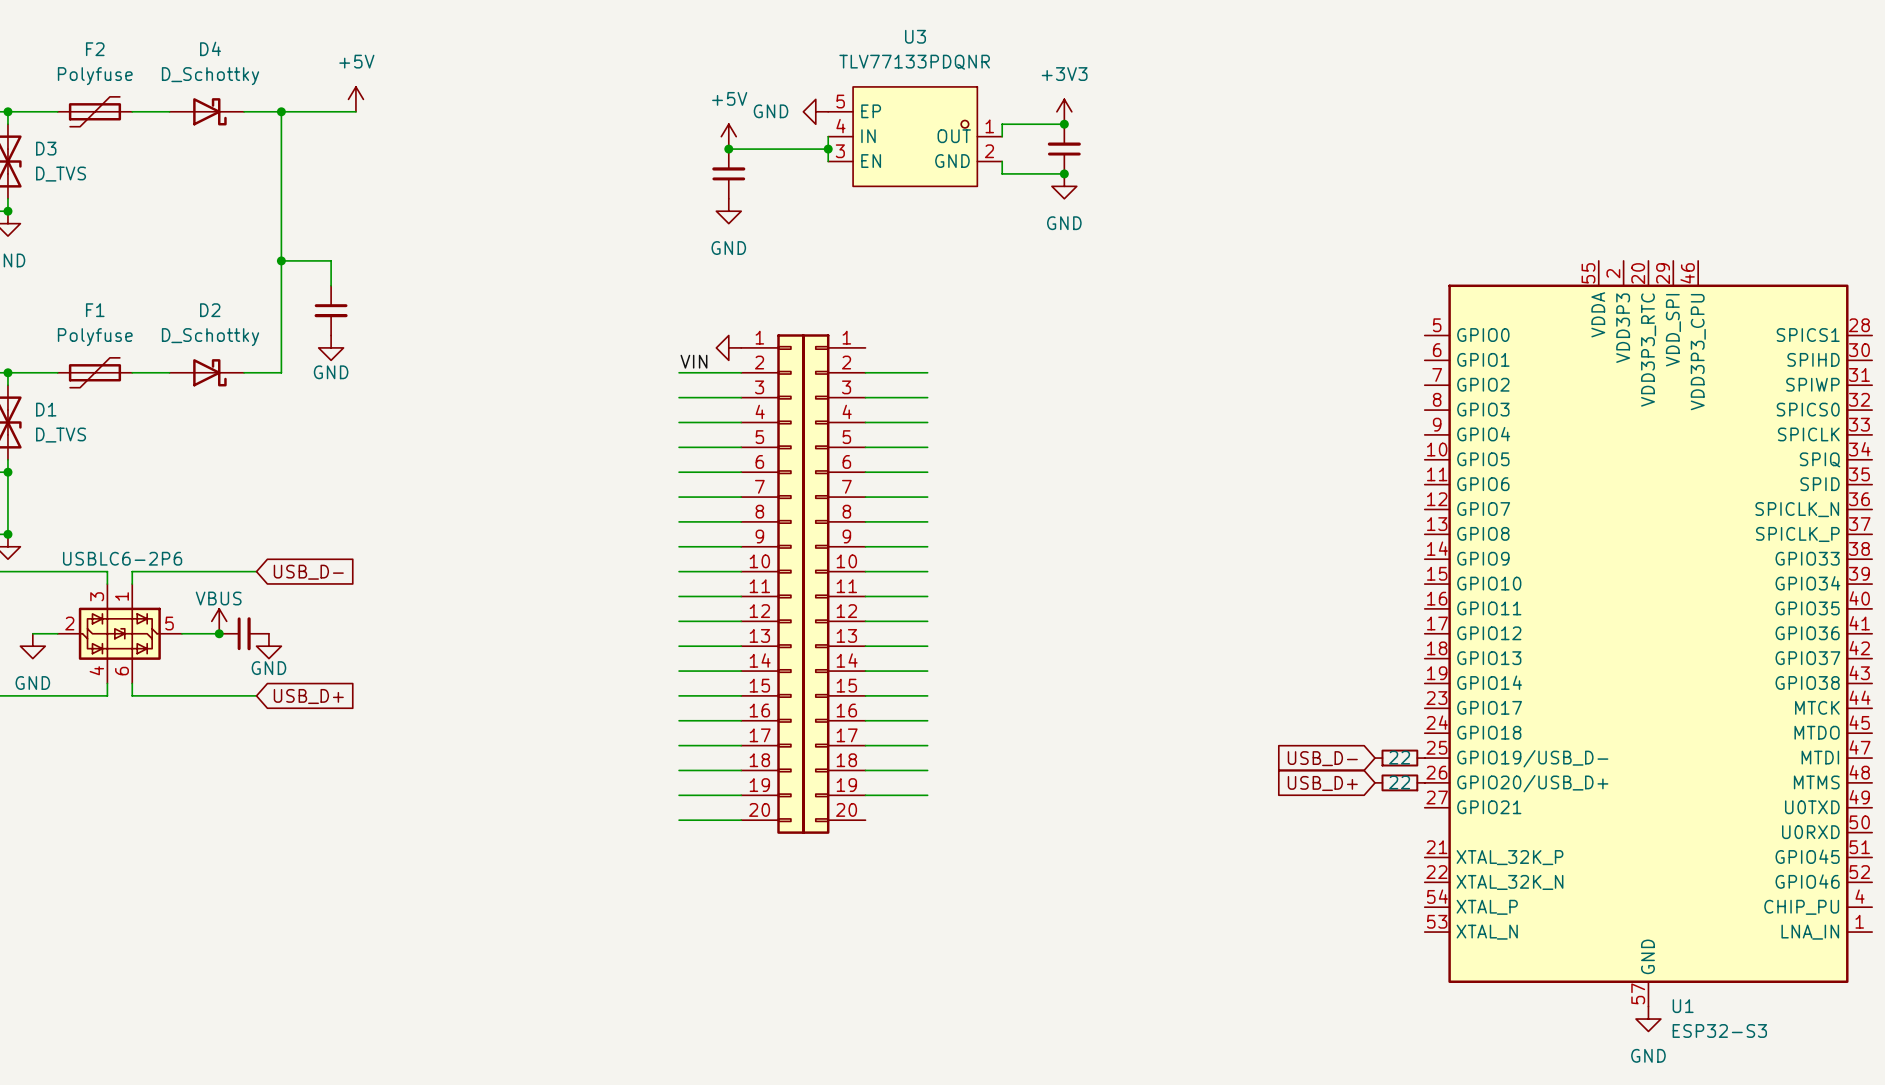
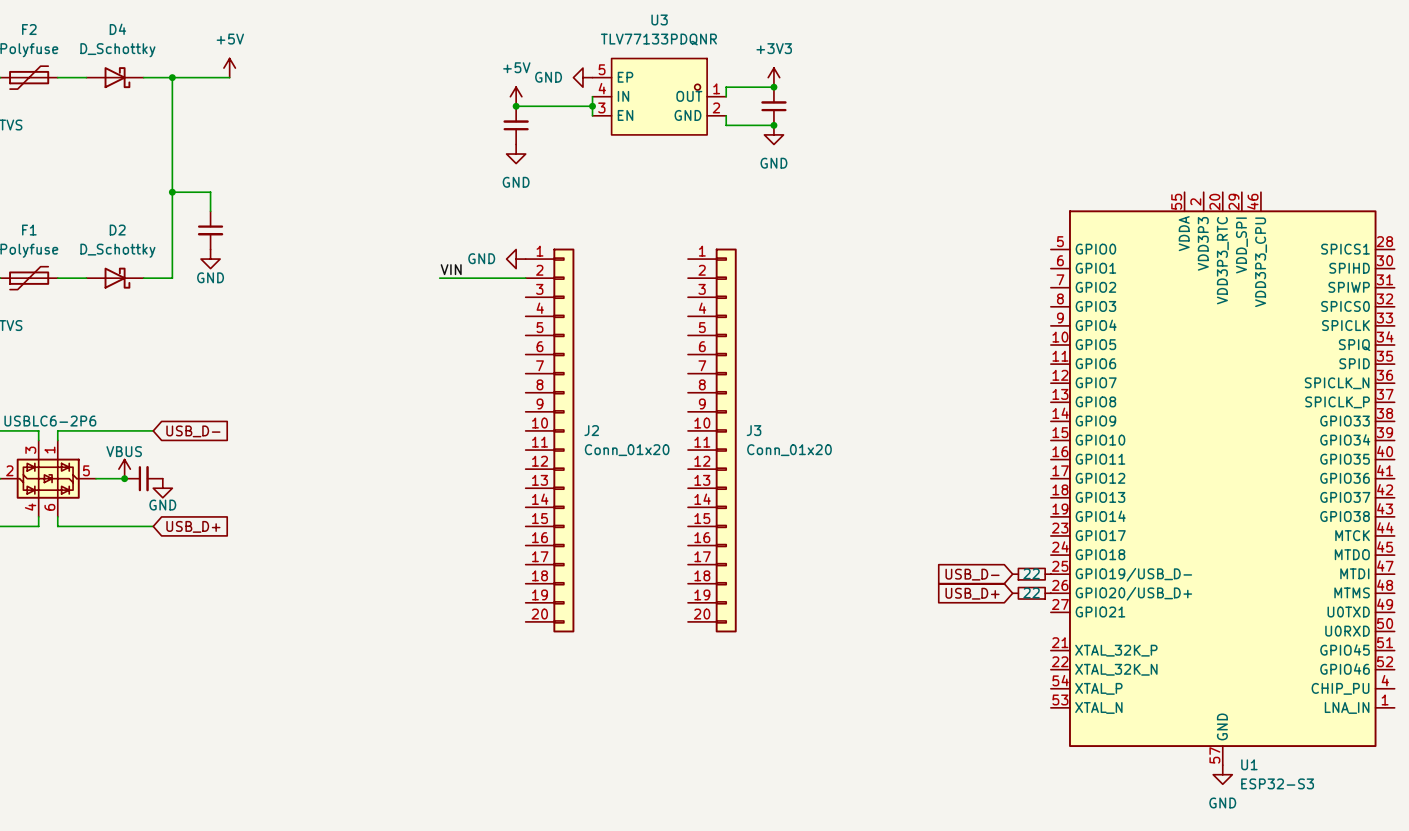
power symbol text: none -> GND (481, 258)
label position: VIN (693, 361) -> VIN (451, 269)
wire: none -> (439, 278) (477, 278)
wire: (865, 372) (927, 372) -> none
wire: (679, 397) (741, 397) -> none
wire: (865, 397) (927, 397) -> none
wire: (679, 422) (741, 422) -> none
wire: (865, 422) (927, 422) -> none
wire: (679, 447) (741, 447) -> none
wire: (865, 447) (927, 447) -> none
wire: (679, 472) (741, 472) -> none
wire: (865, 472) (927, 472) -> none
wire: (679, 497) (741, 497) -> none
wire: (865, 497) (927, 497) -> none
wire: (679, 521) (741, 521) -> none
wire: (865, 521) (927, 521) -> none
wire: (679, 546) (741, 546) -> none
wire: (865, 546) (927, 546) -> none
wire: (679, 571) (741, 571) -> none
J2 name: none -> J2 (591, 430)
wire: (865, 571) (927, 571) -> none
part: (833, 584) -> none
J3: none -> Conn_01x20 (712, 440)
wire: (679, 596) (741, 596) -> none
wire: (865, 596) (927, 596) -> none
J2 value: none -> Conn_01x20 (627, 450)
wire: (679, 621) (741, 621) -> none
wire: (865, 621) (927, 621) -> none
wire: (679, 646) (741, 646) -> none
wire: (865, 646) (927, 646) -> none
wire: (679, 671) (741, 671) -> none
wire: (865, 671) (927, 671) -> none
wire: (679, 695) (741, 695) -> none
wire: (865, 695) (927, 695) -> none
wire: (679, 720) (741, 720) -> none
wire: (865, 720) (927, 720) -> none
wire: (679, 745) (741, 745) -> none
wire: (865, 745) (927, 745) -> none
wire: (679, 770) (741, 770) -> none
wire: (865, 770) (927, 770) -> none
wire: (679, 795) (741, 795) -> none
wire: (865, 795) (927, 795) -> none
wire: (679, 820) (741, 820) -> none

